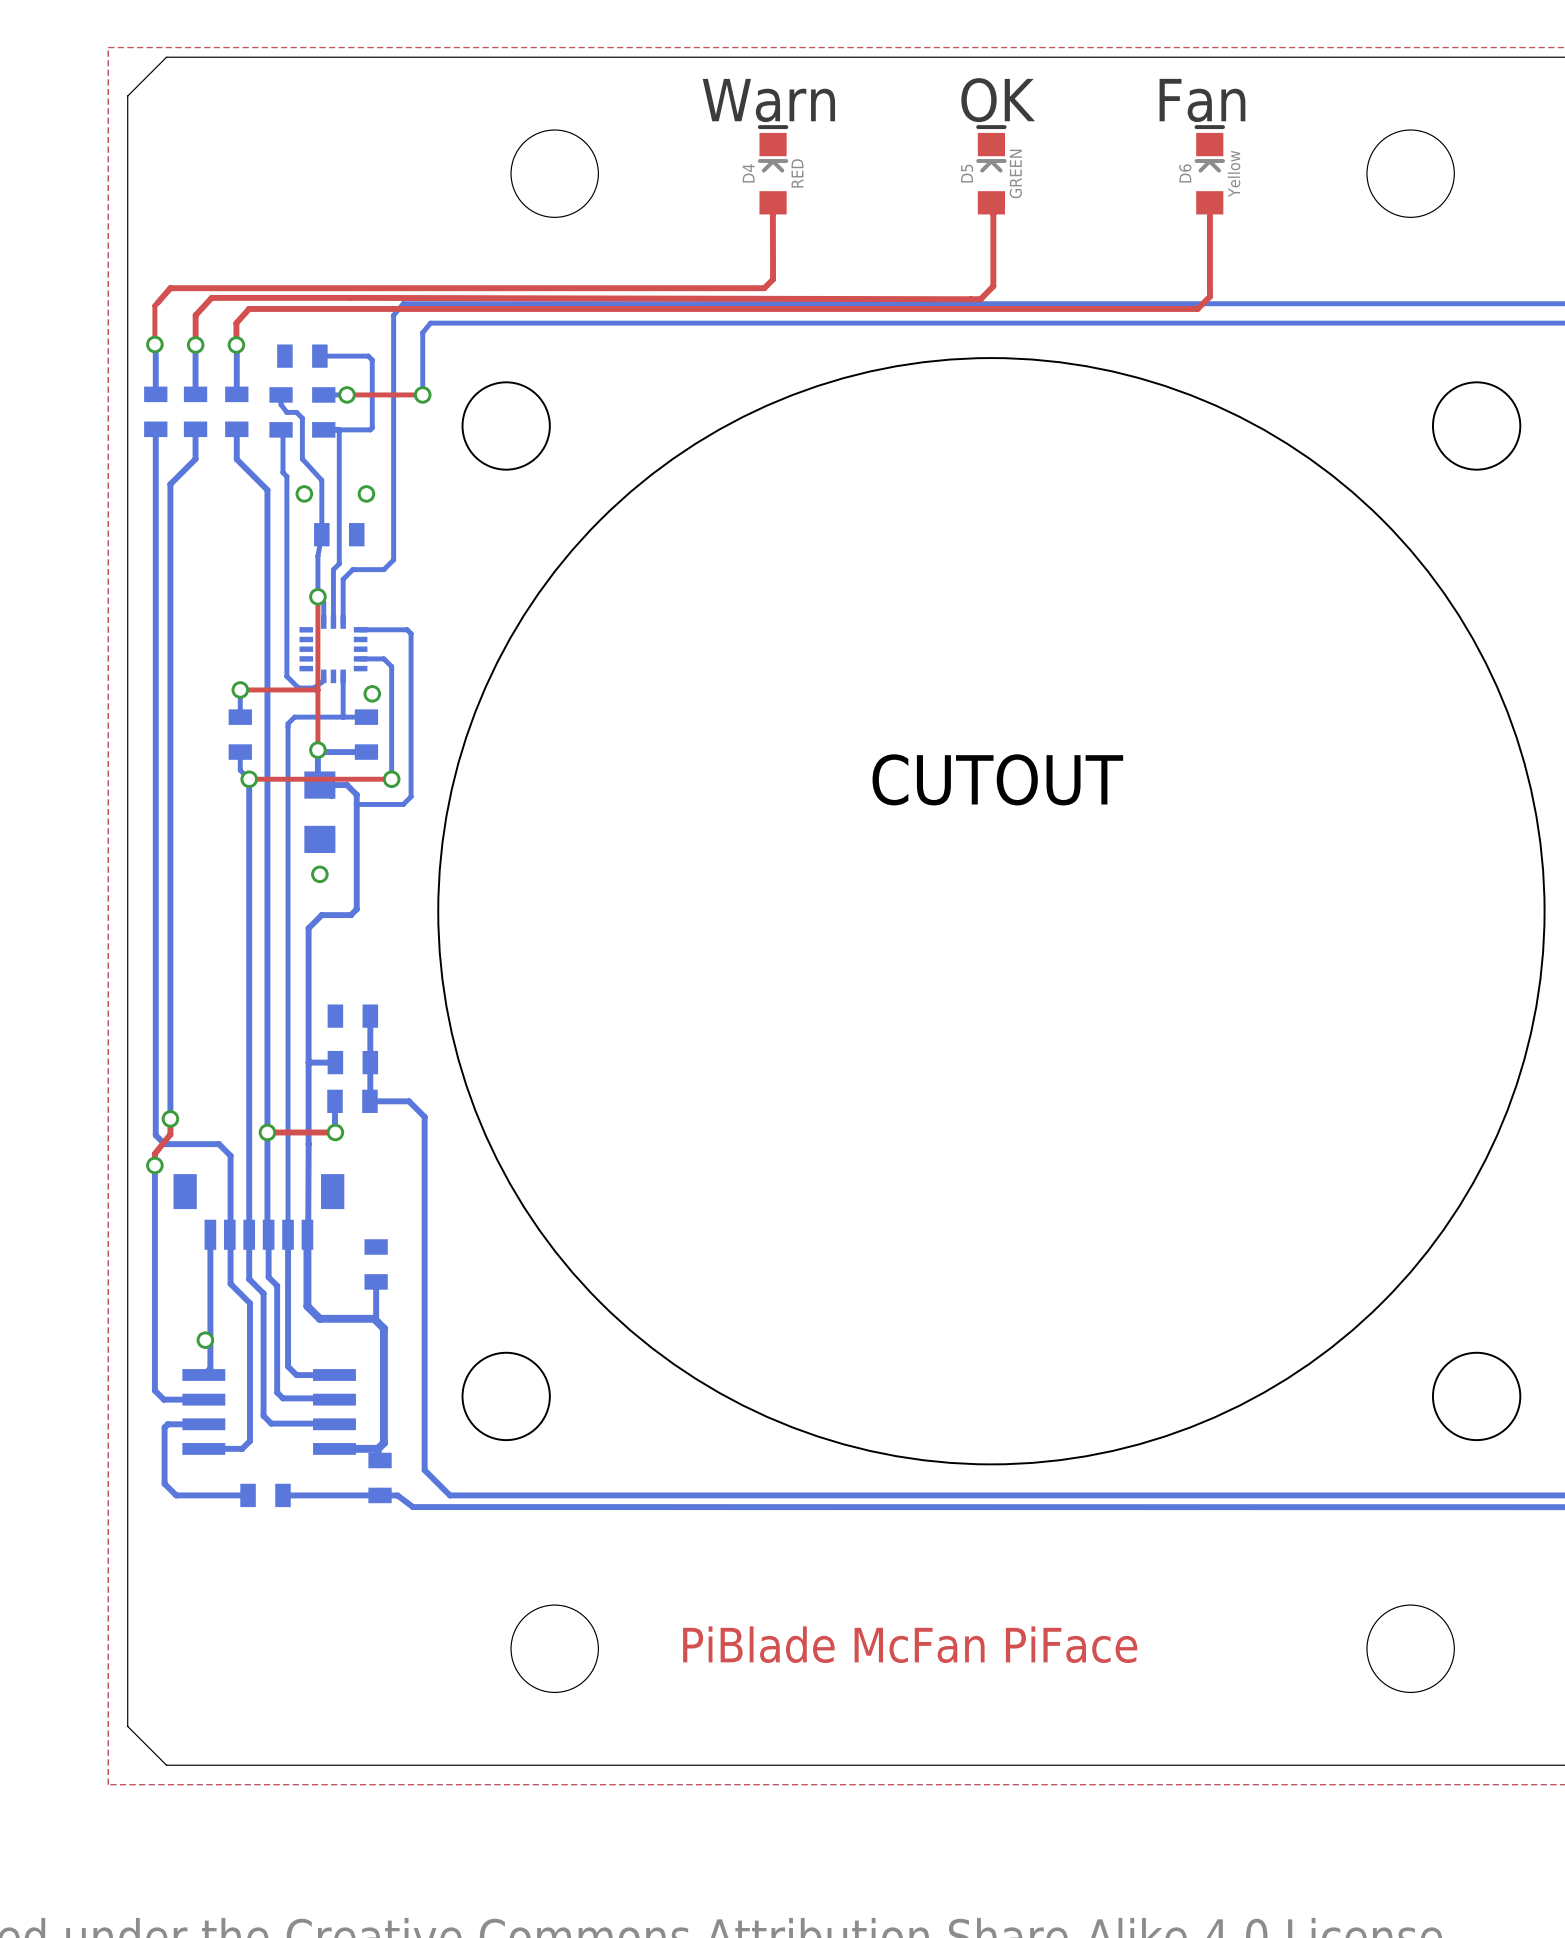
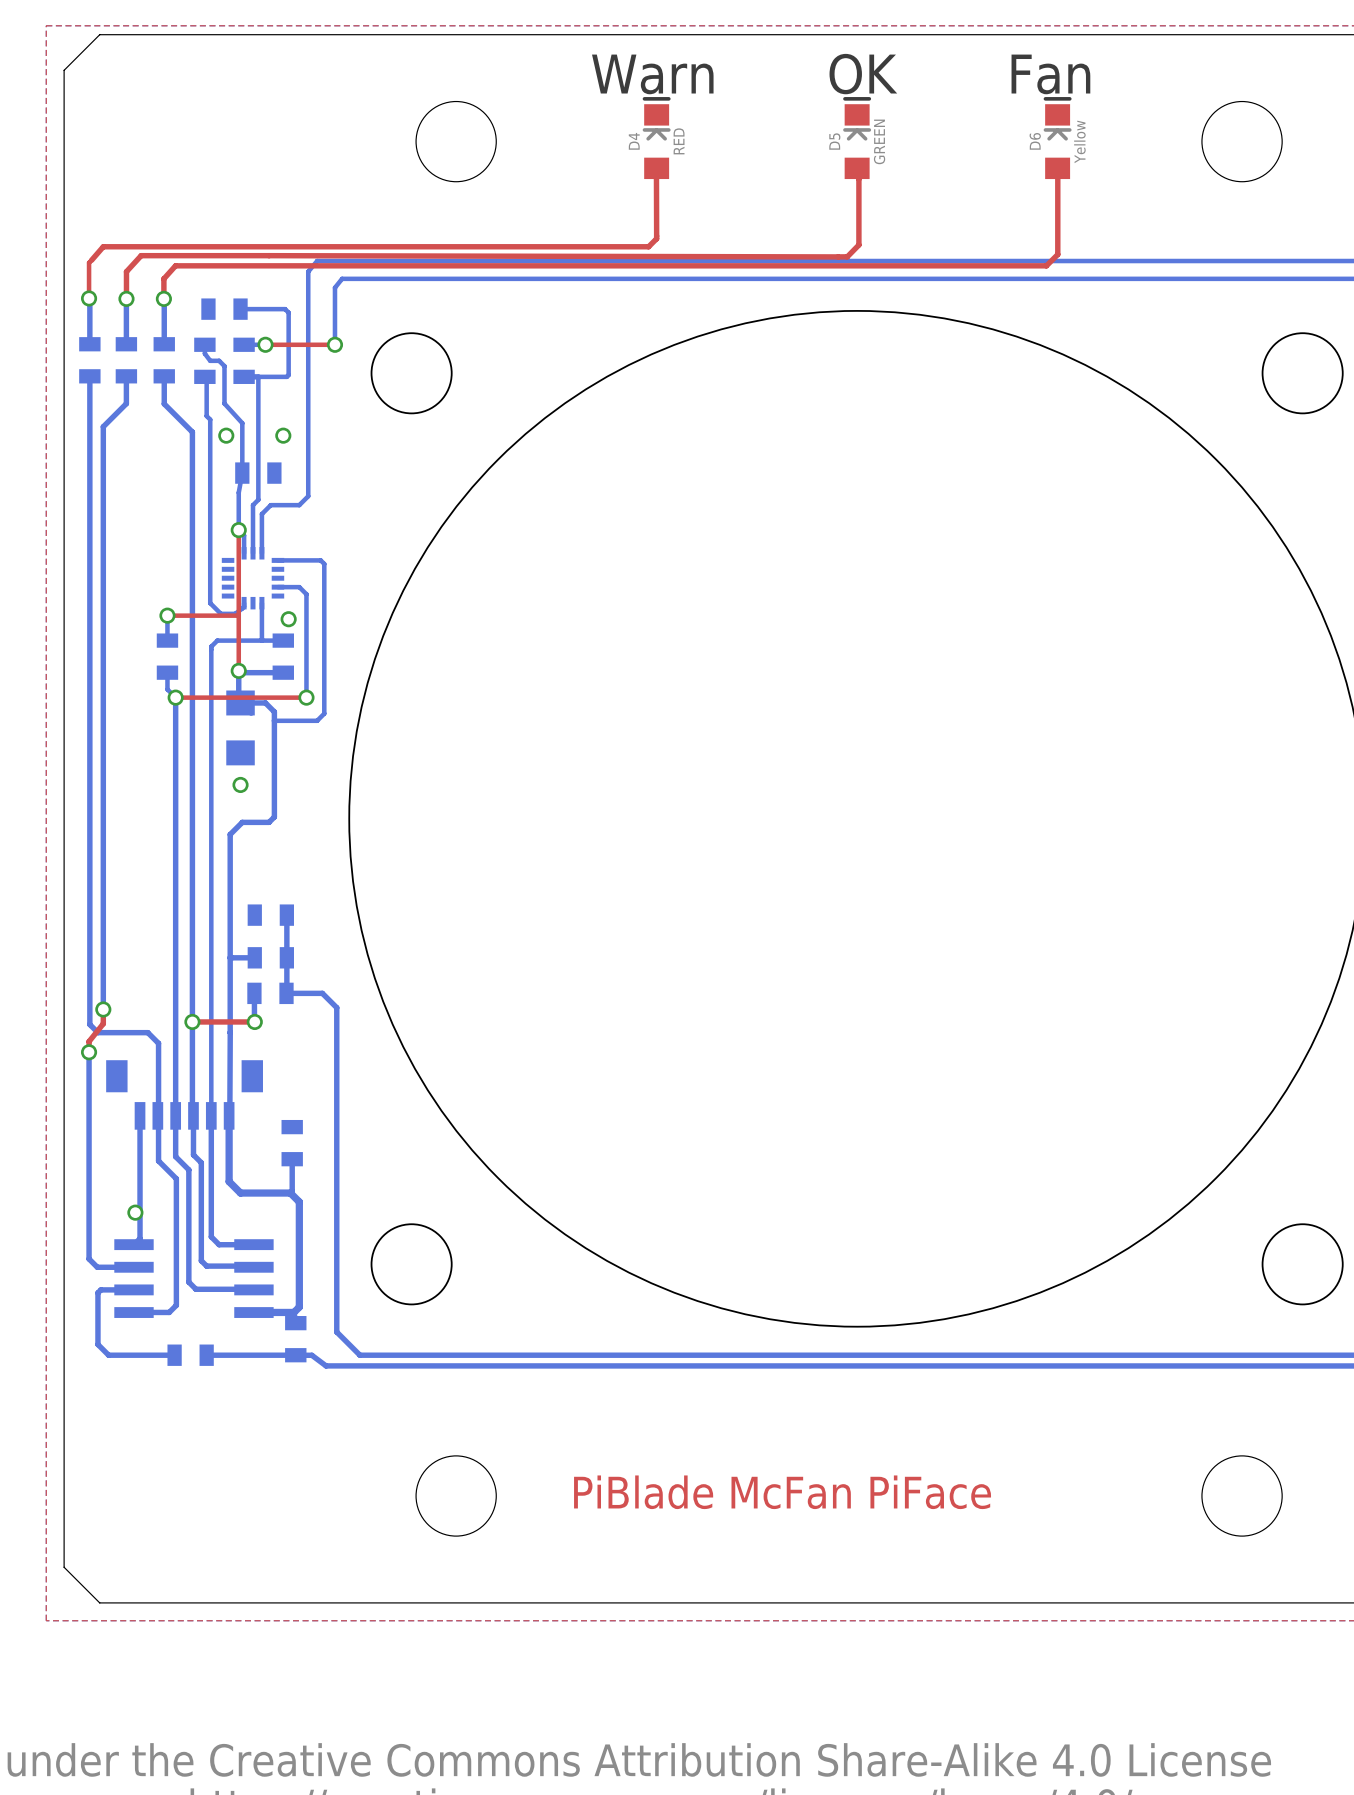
text: CUTOUT (997, 779) -> none

